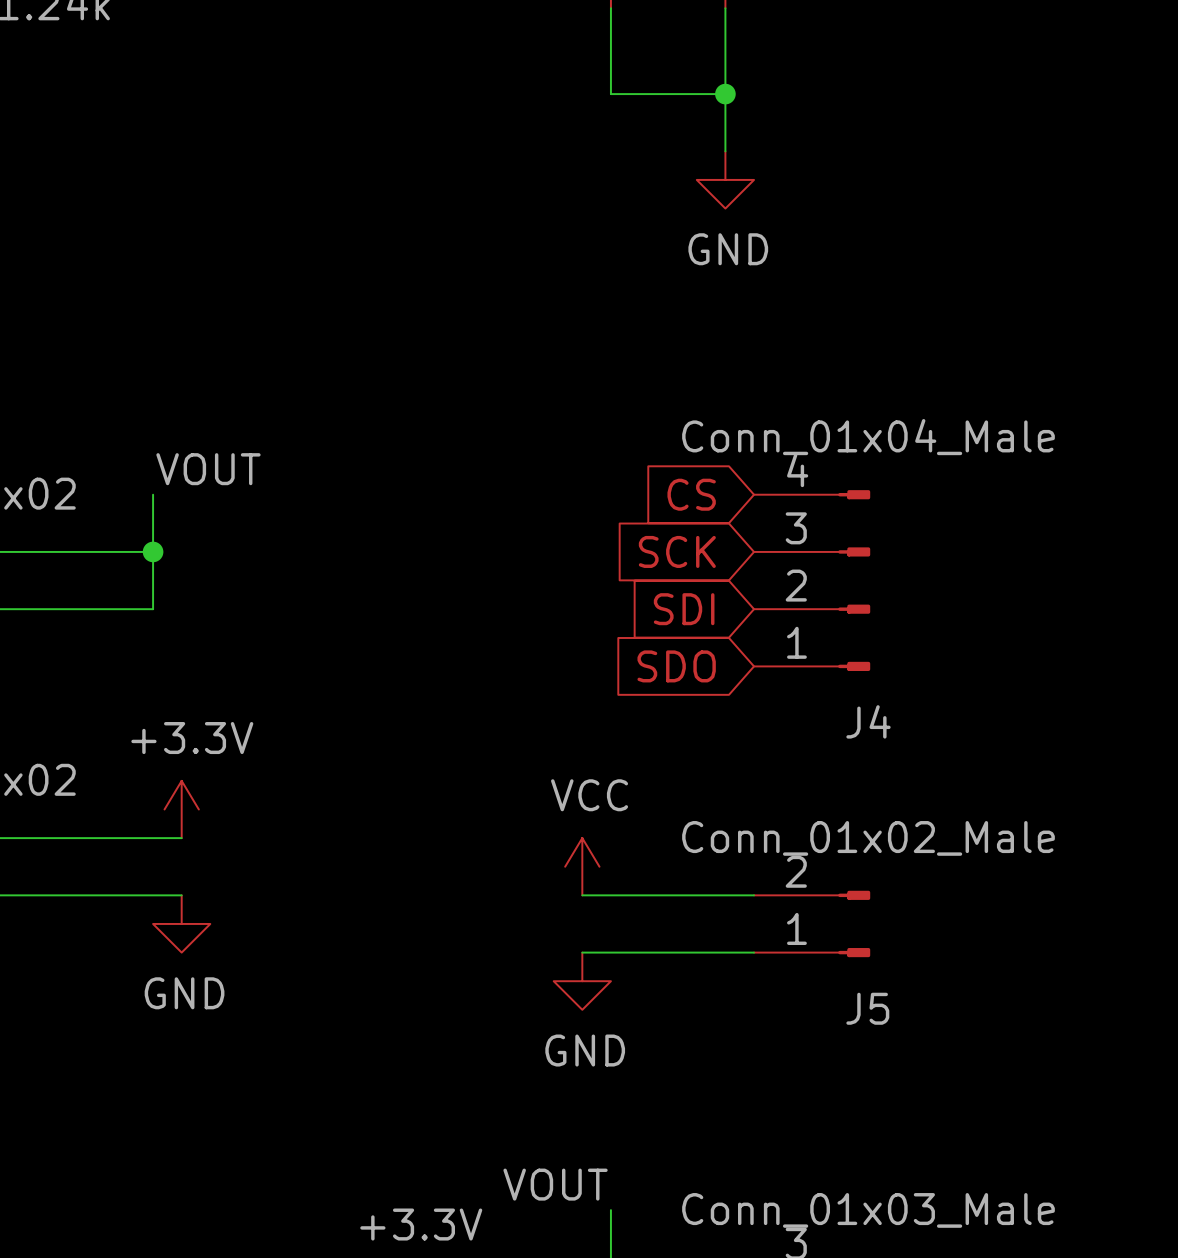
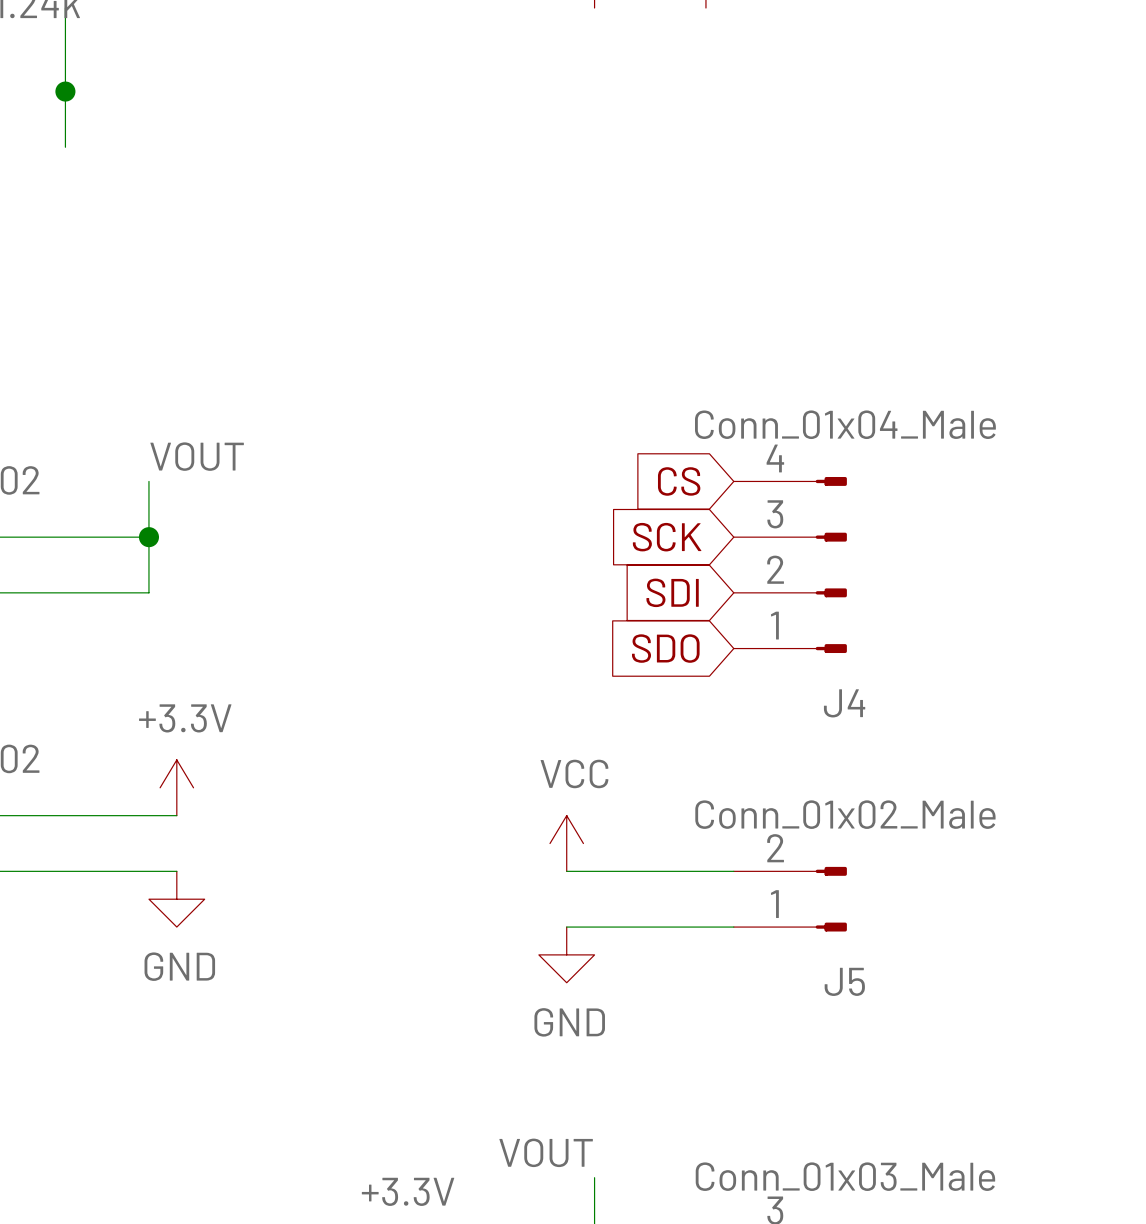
wire: none -> (65, 8) (65, 147)
wire: (610, 8) (610, 94) (725, 94) -> none
wire: (725, 8) (725, 151) -> none
junction: none -> (65, 91)
junction: (725, 94) -> none
power symbol: GND (725, 179) -> none

